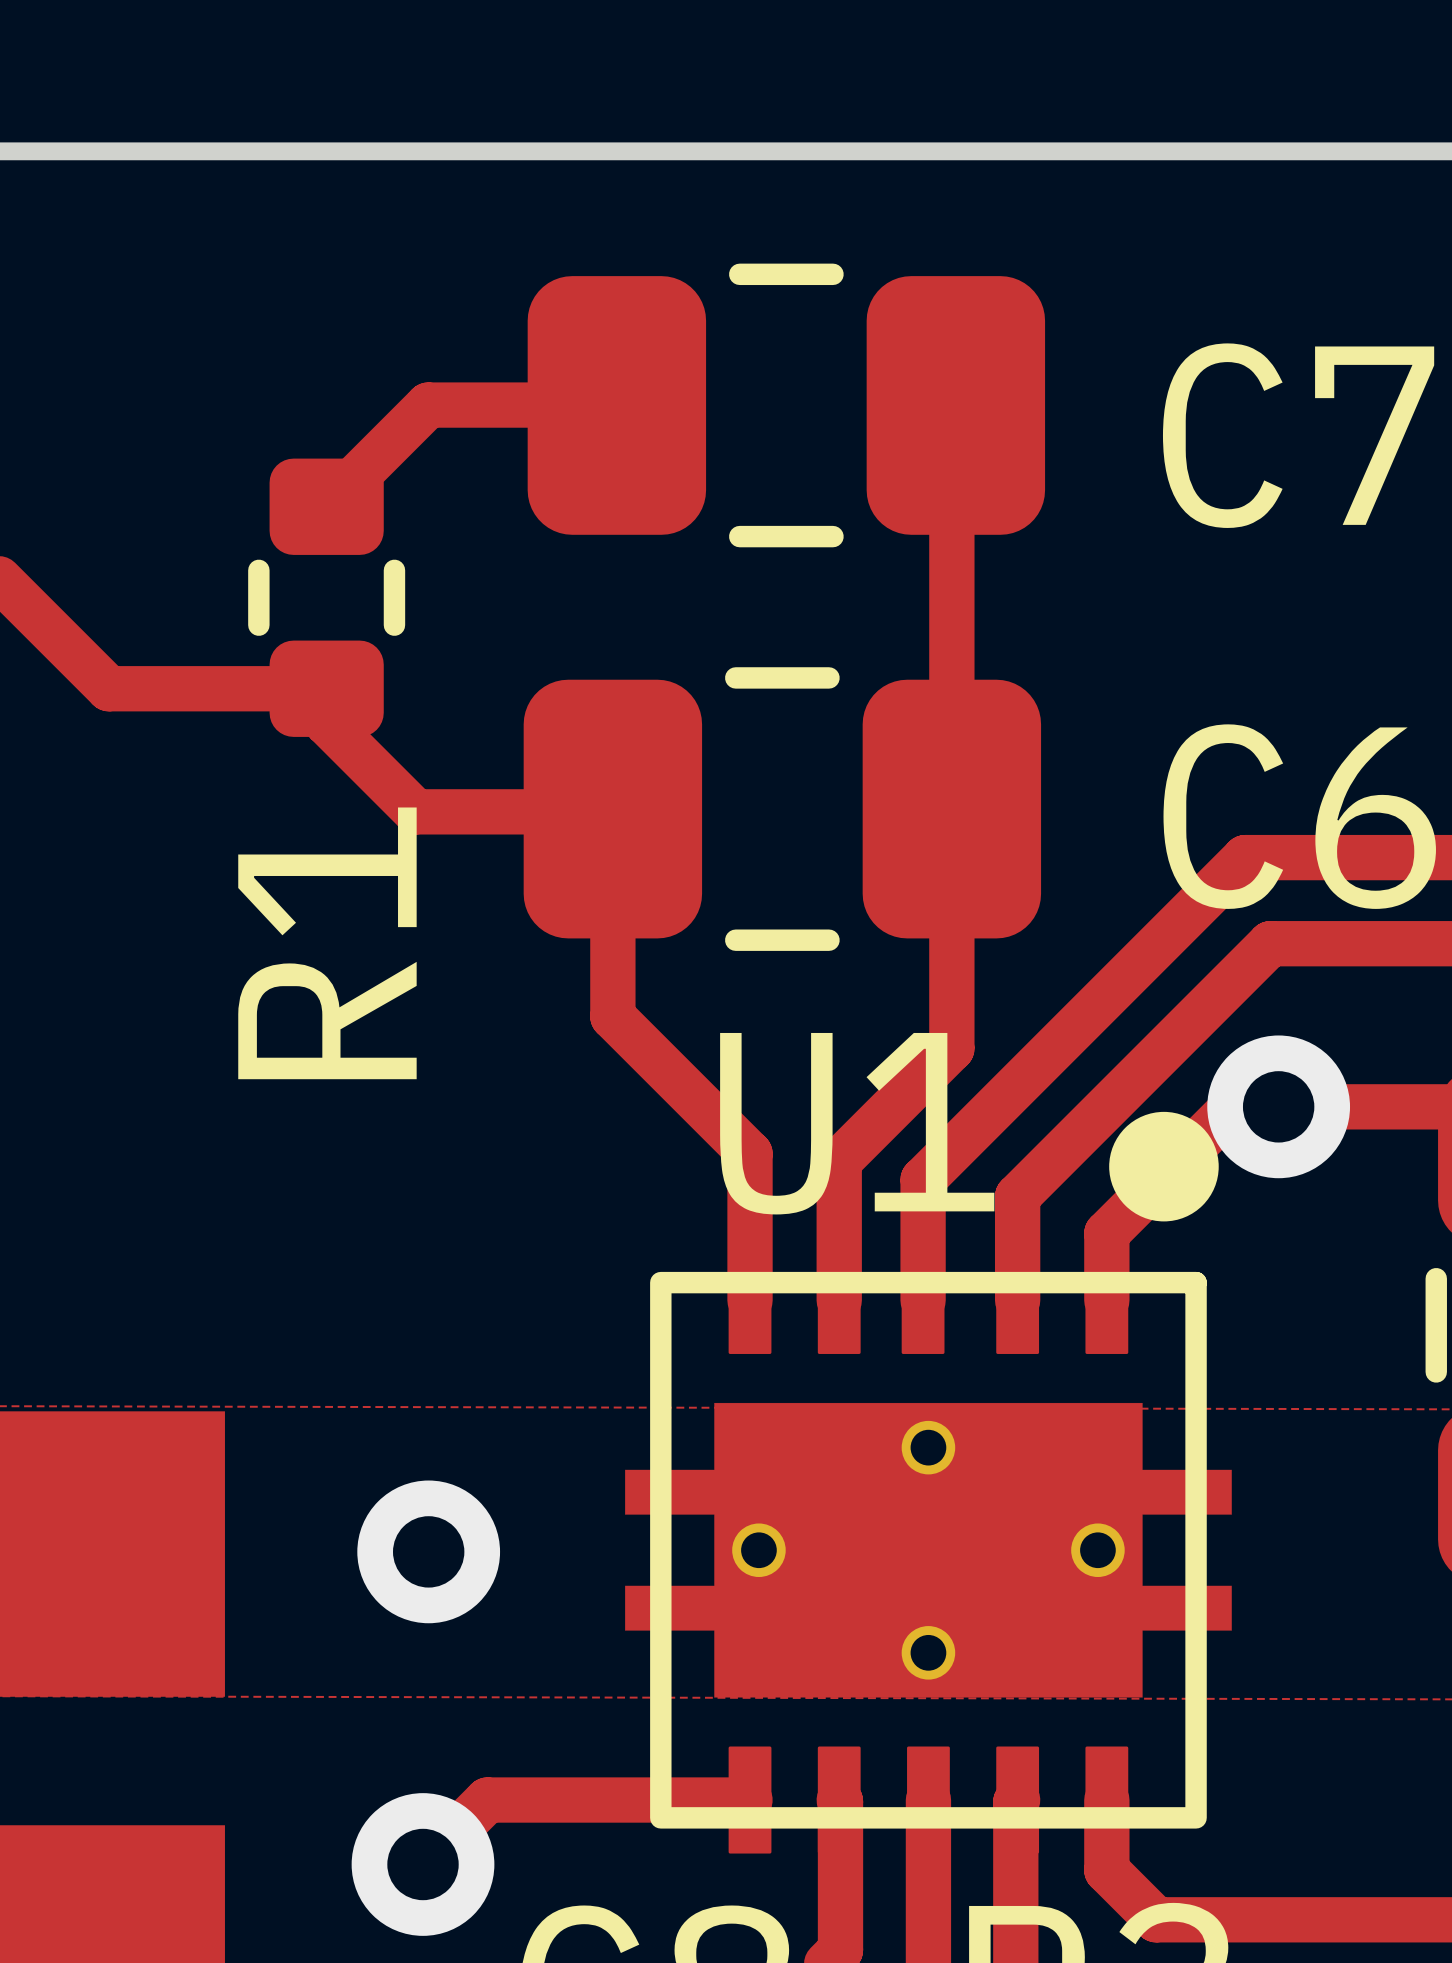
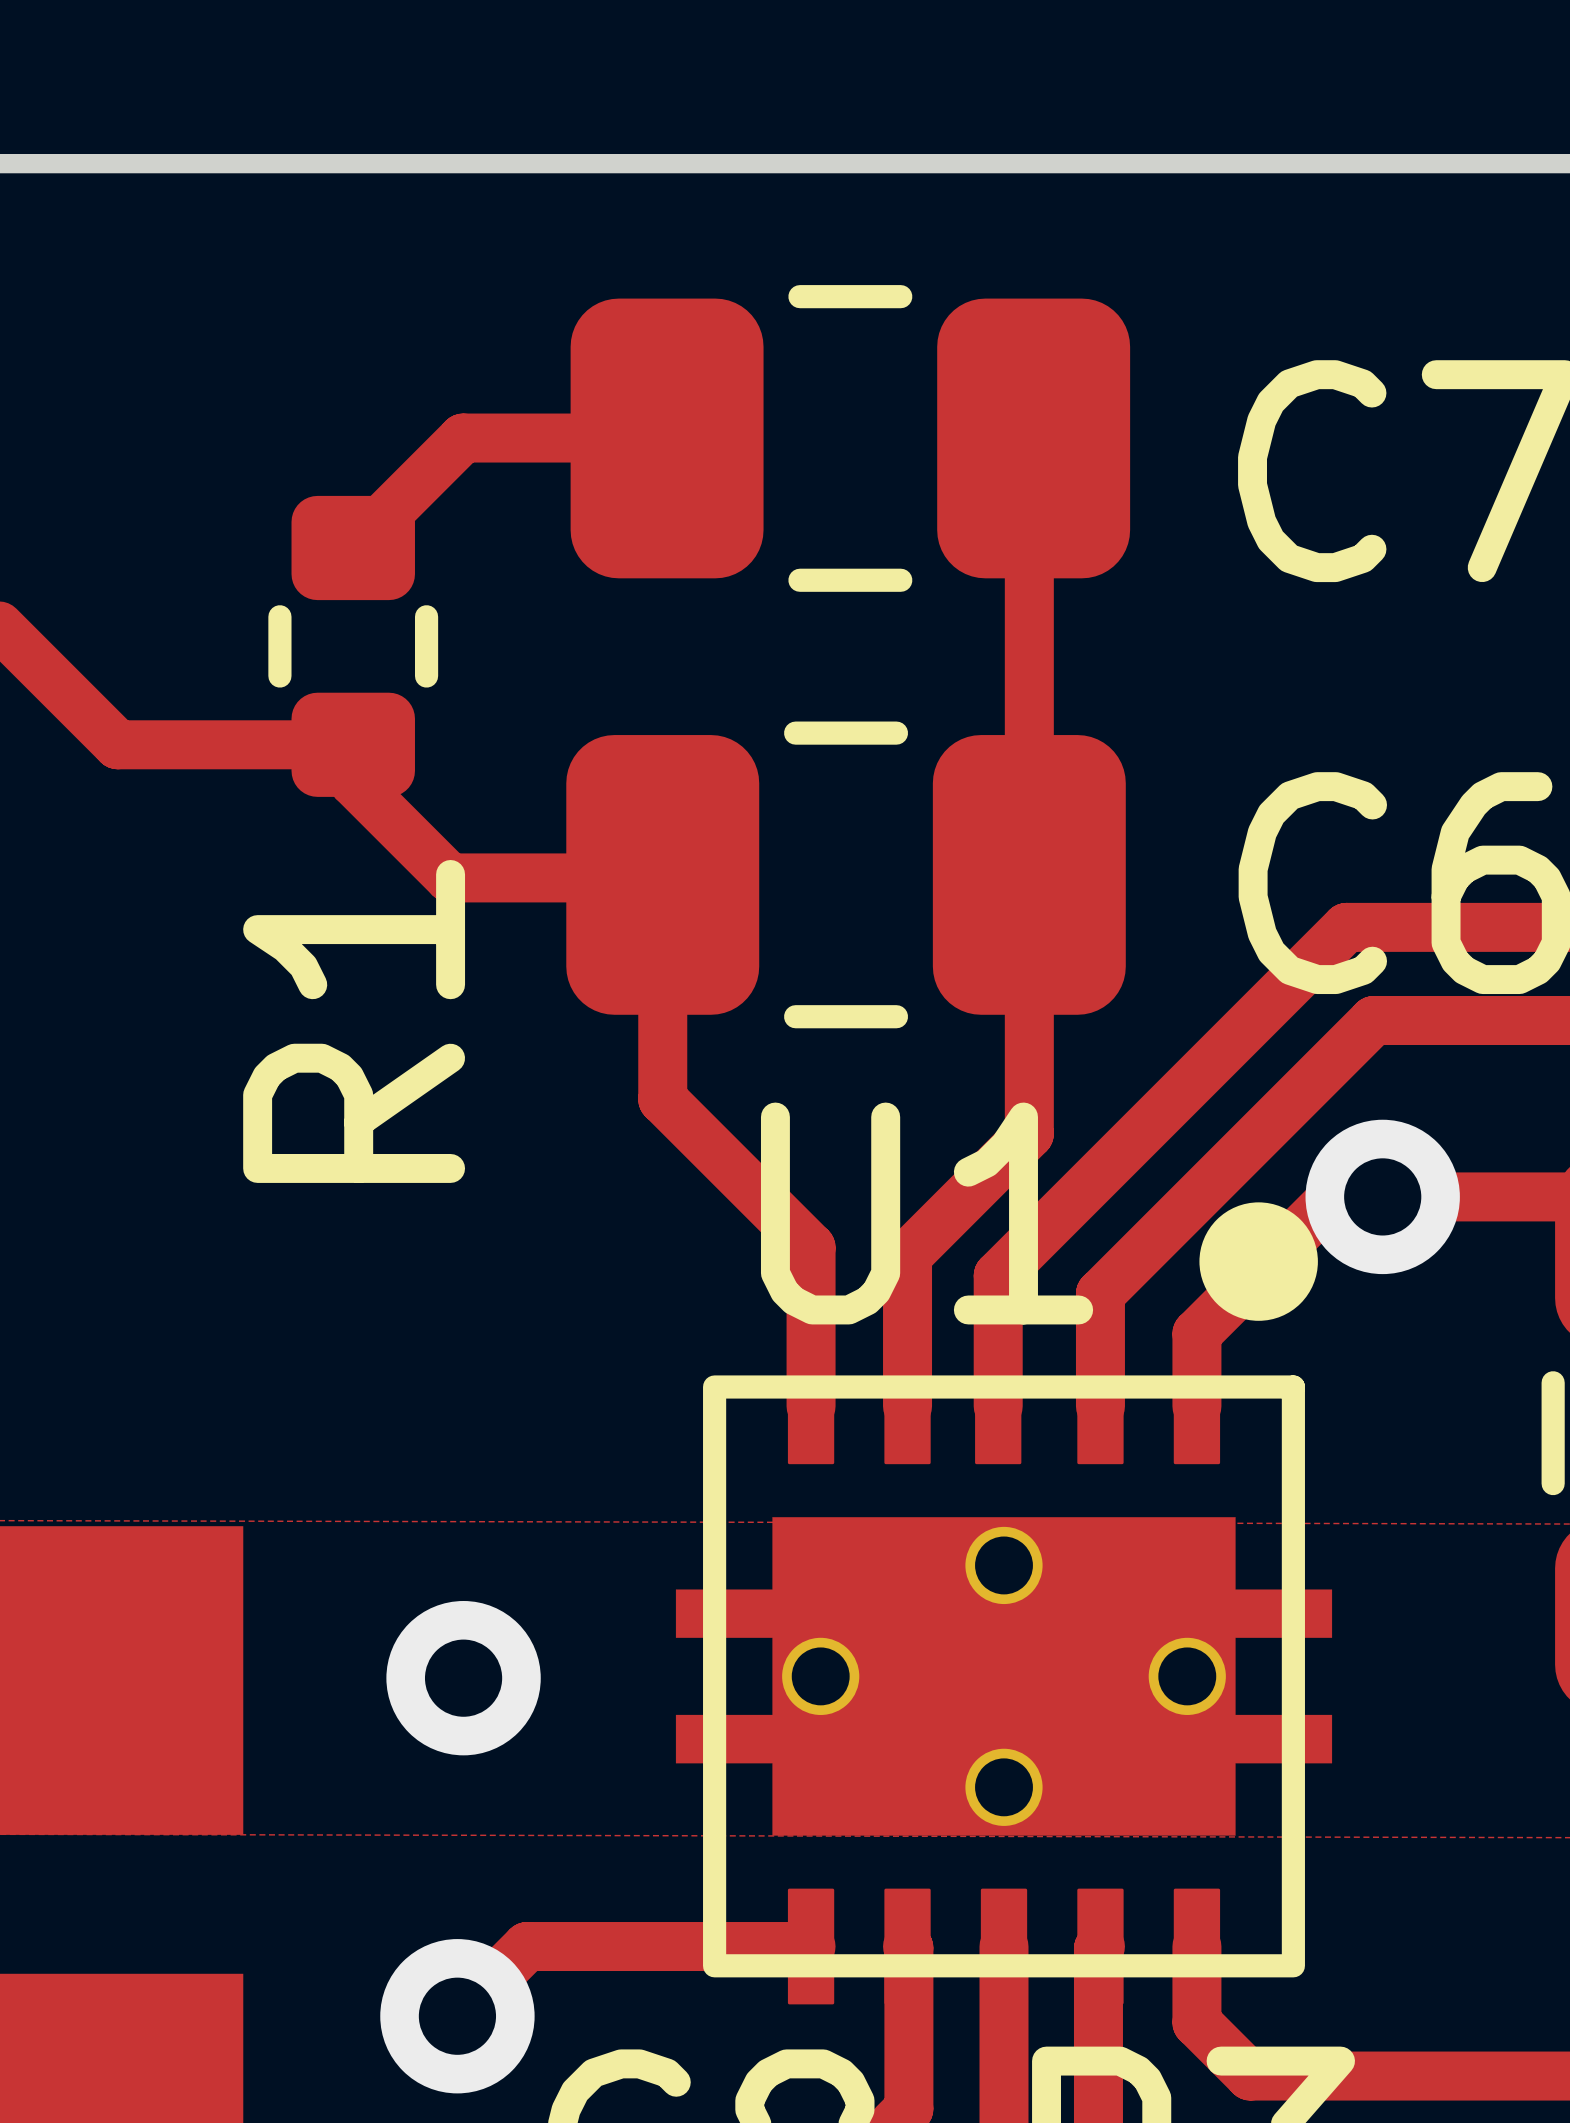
U1 footprint: [625, 1111, 1232, 1854] -> [675, 1202, 1333, 2005]

